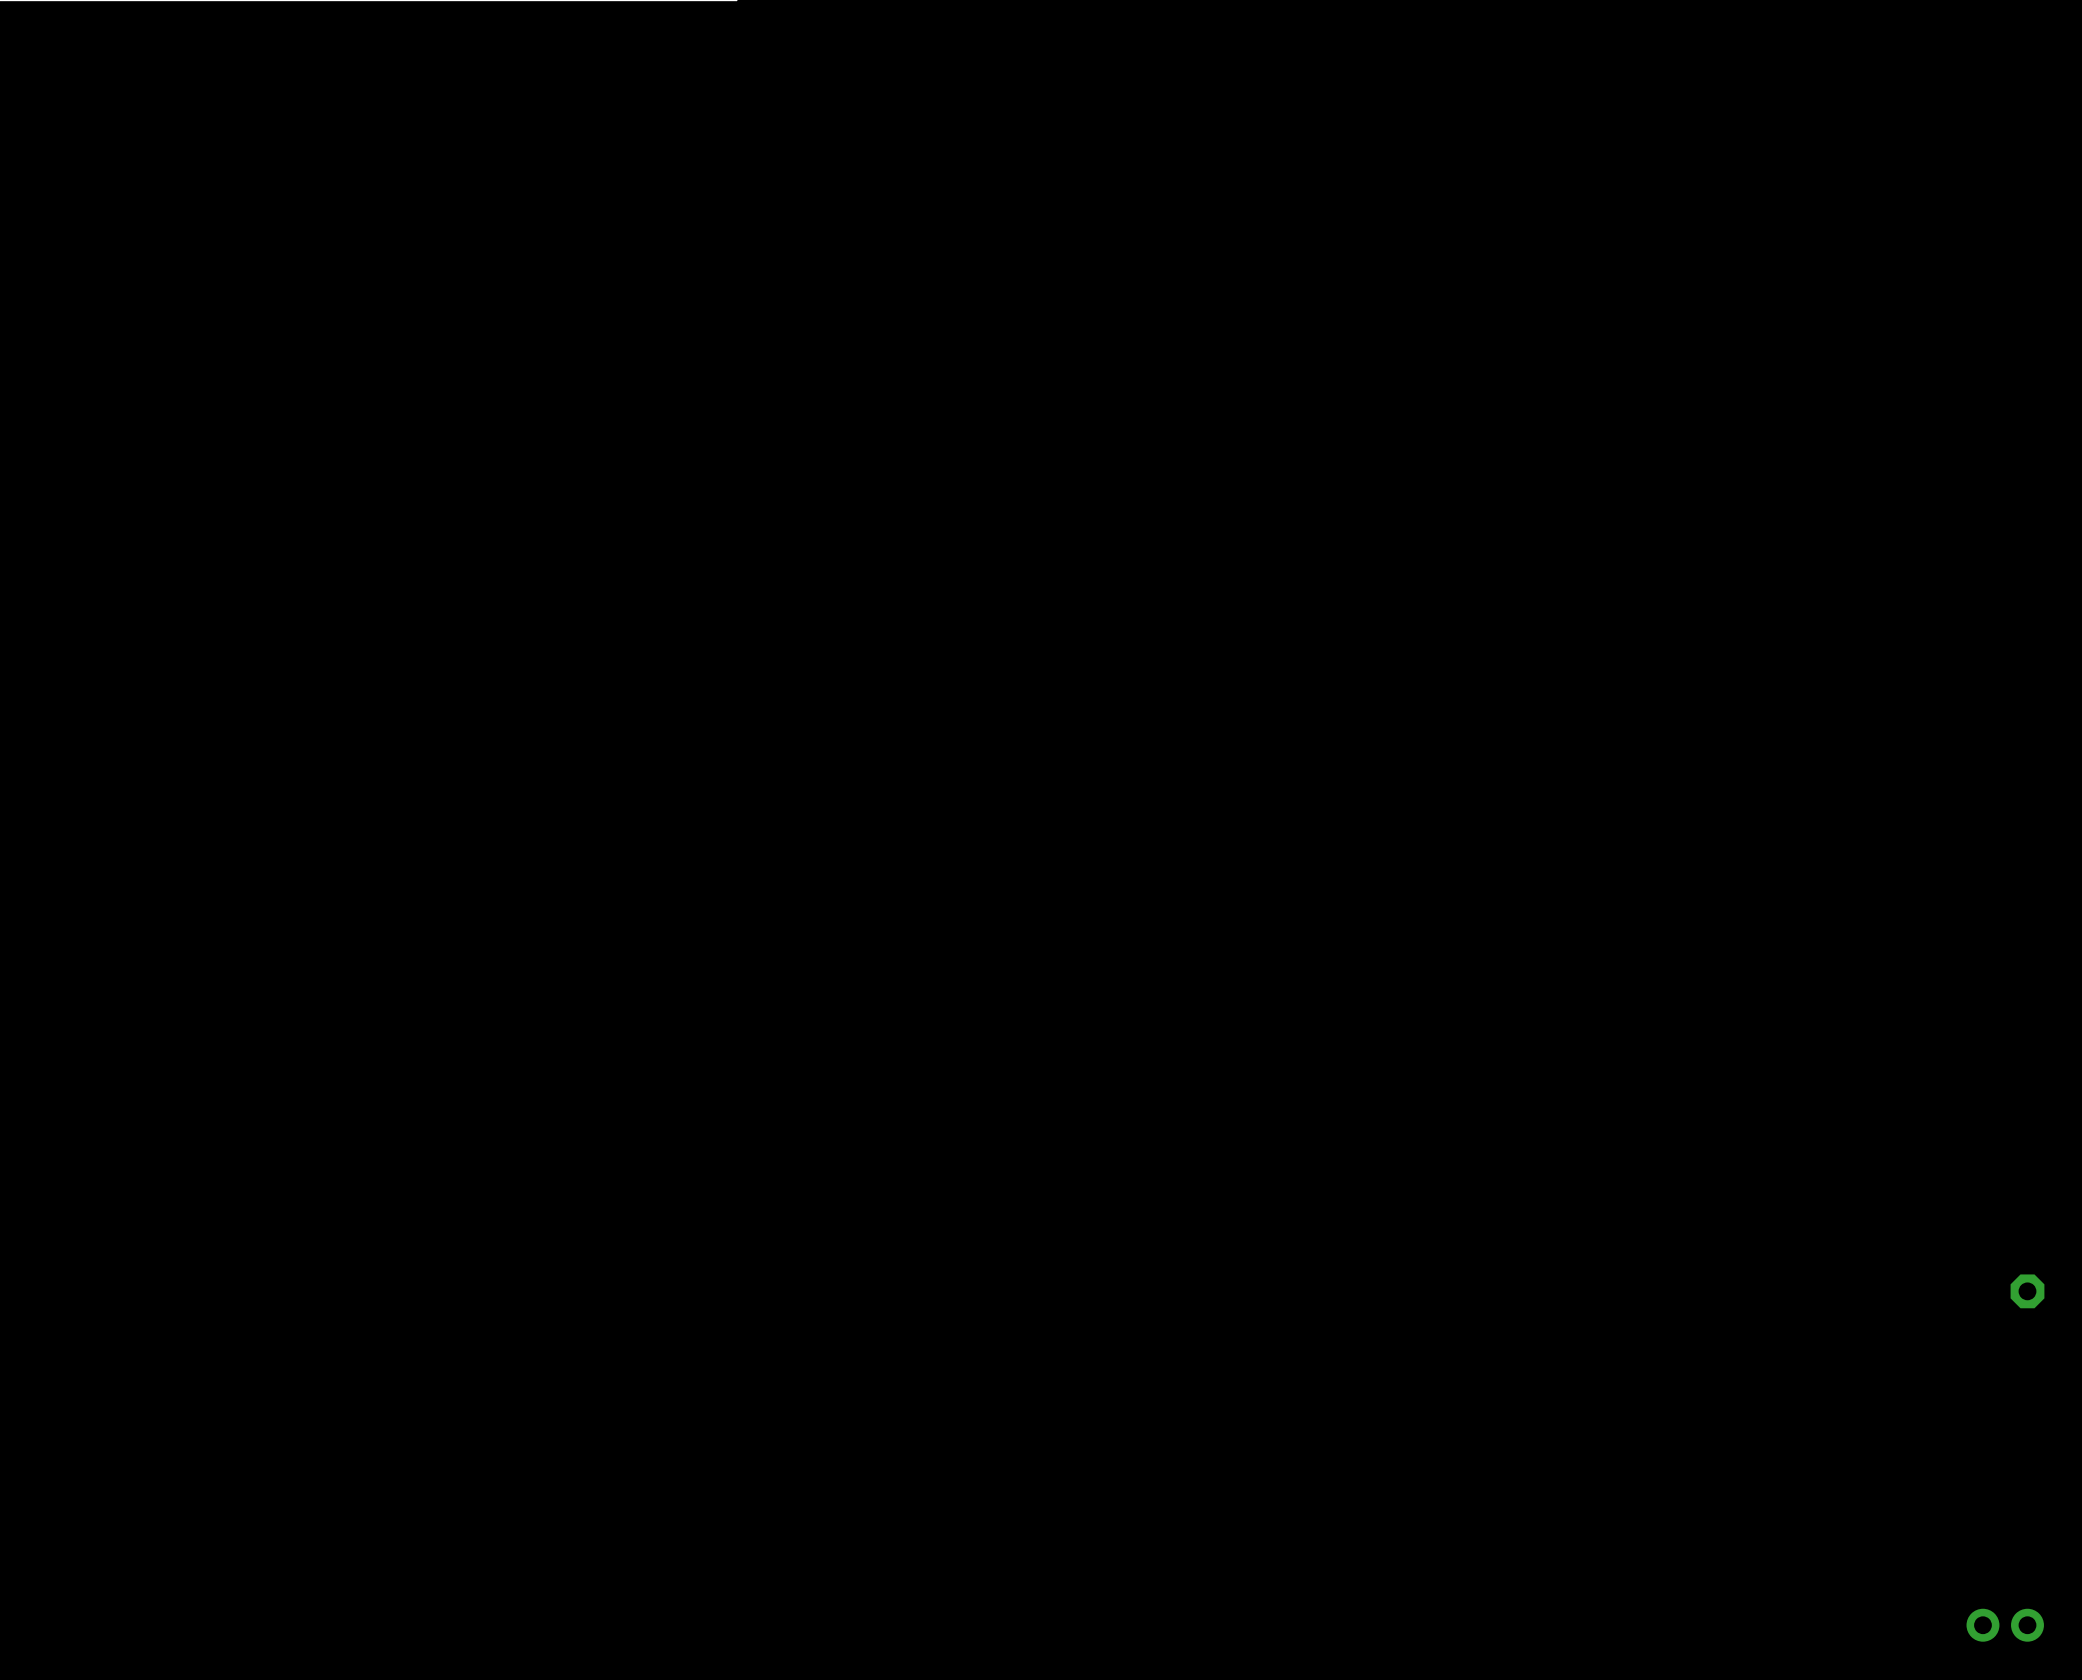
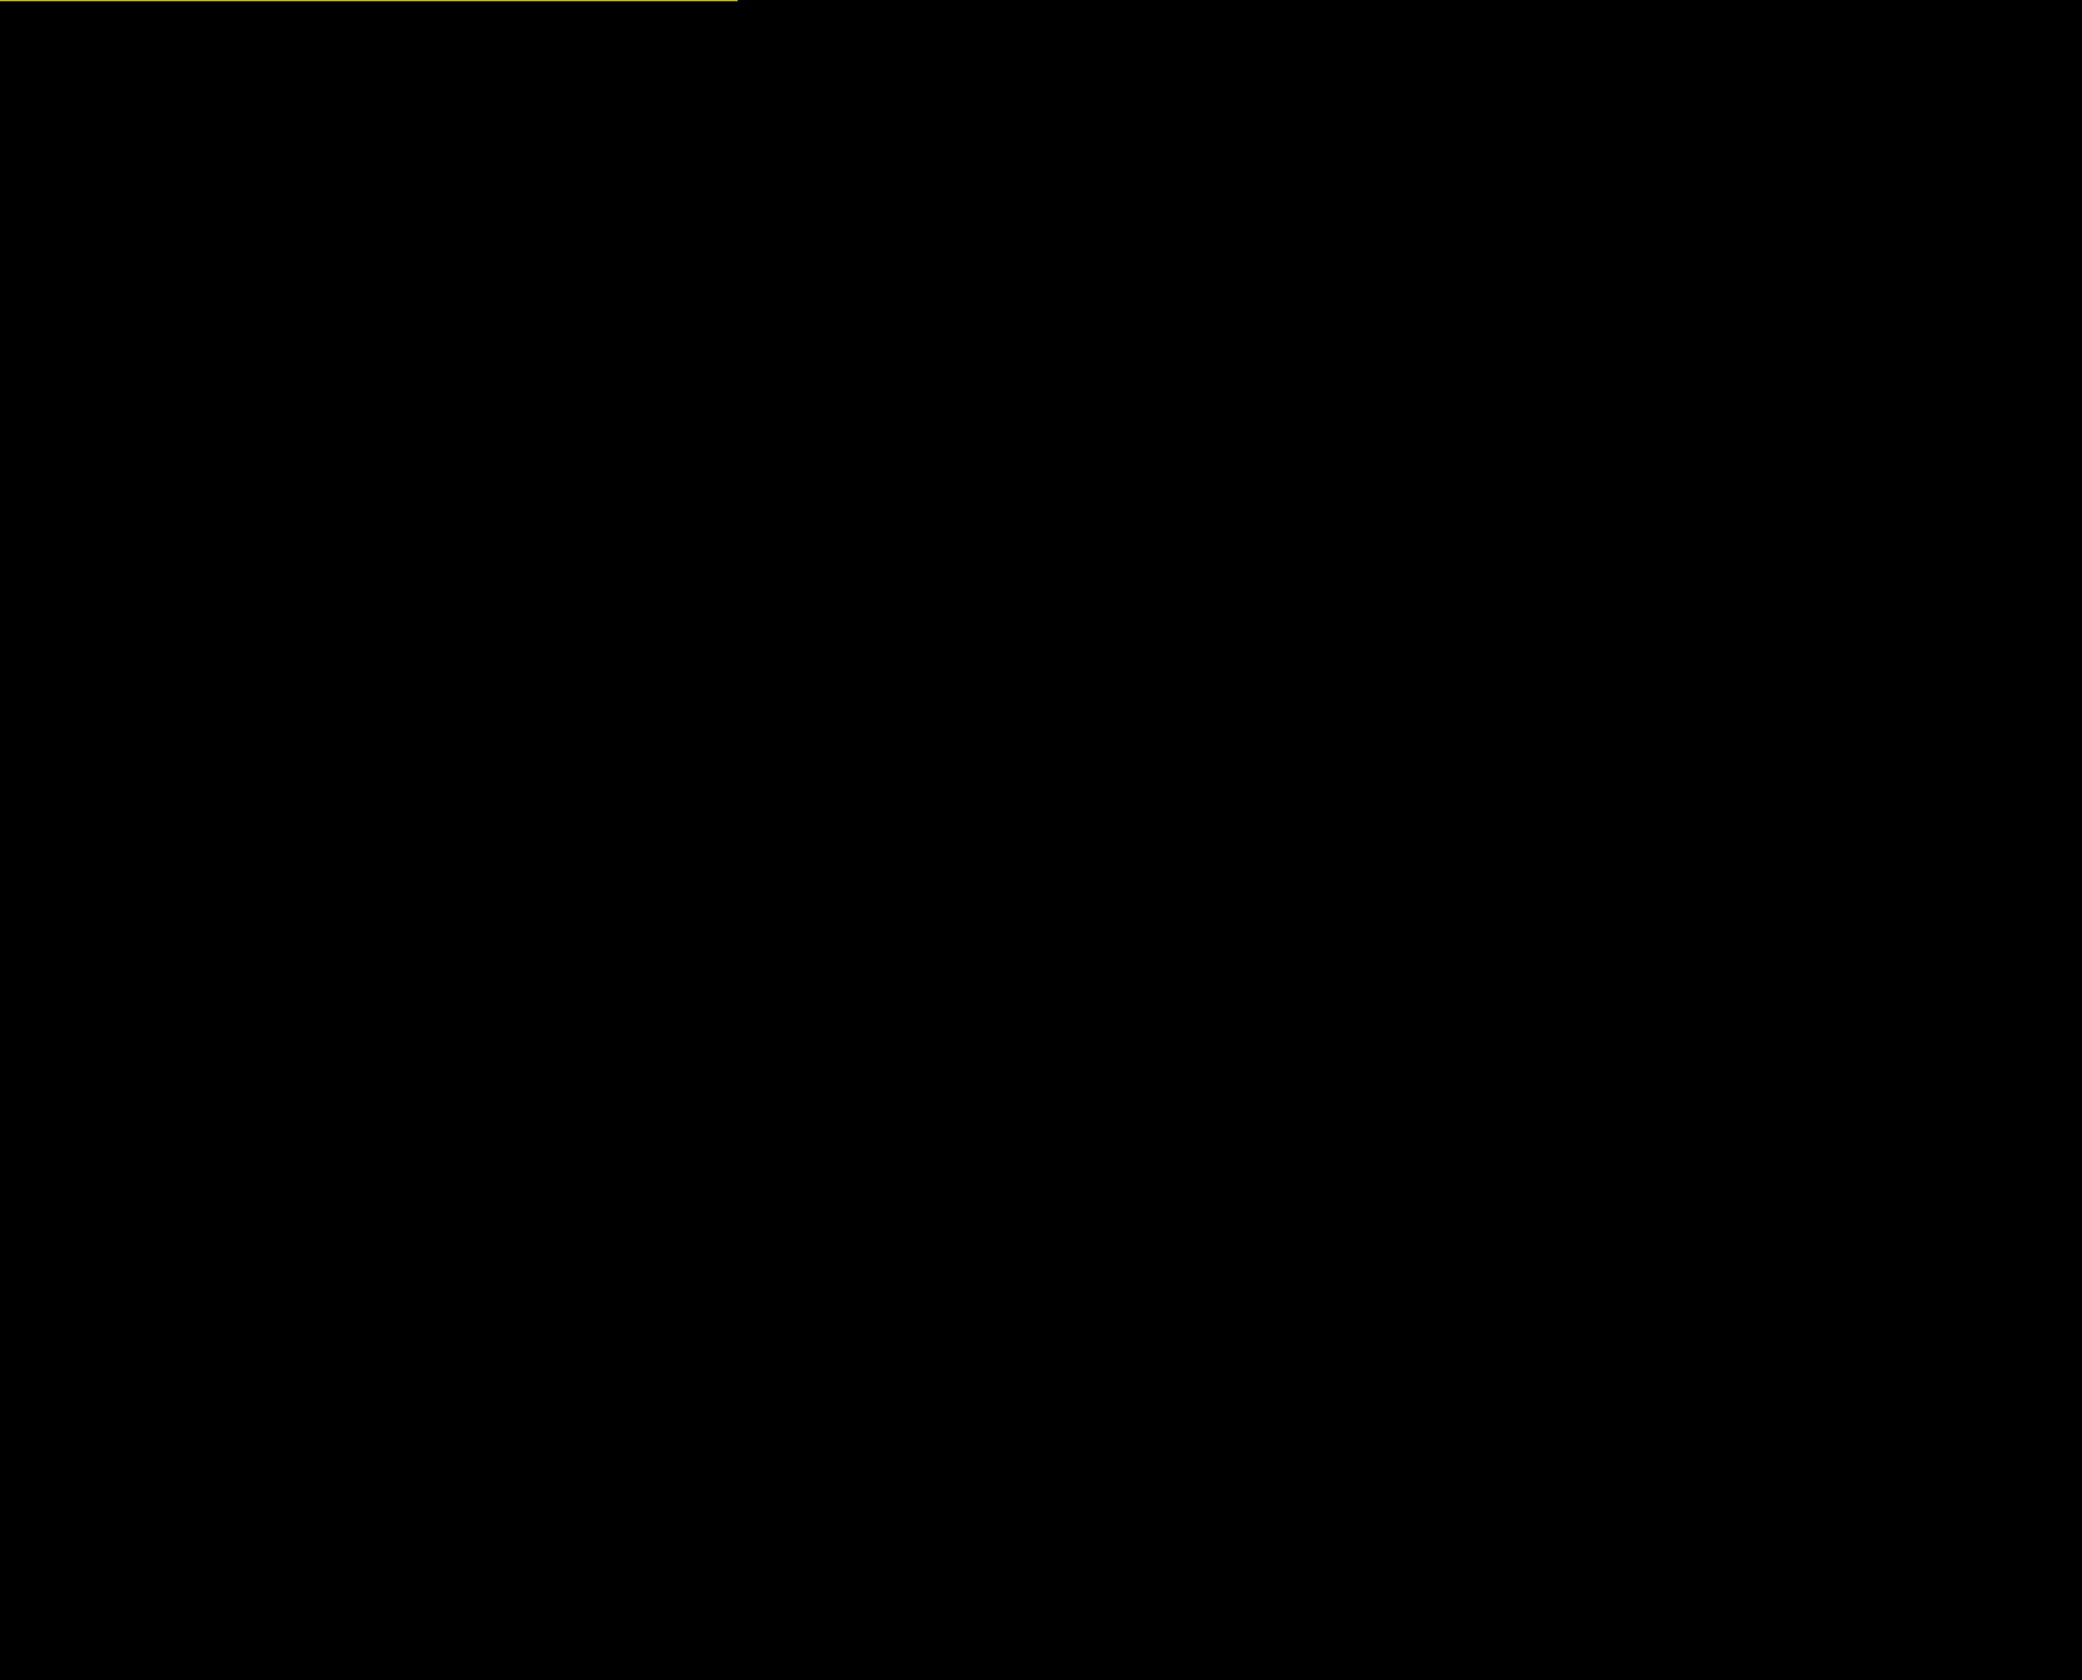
part: (2027, 1291) -> none
part: (2005, 1625) -> none

